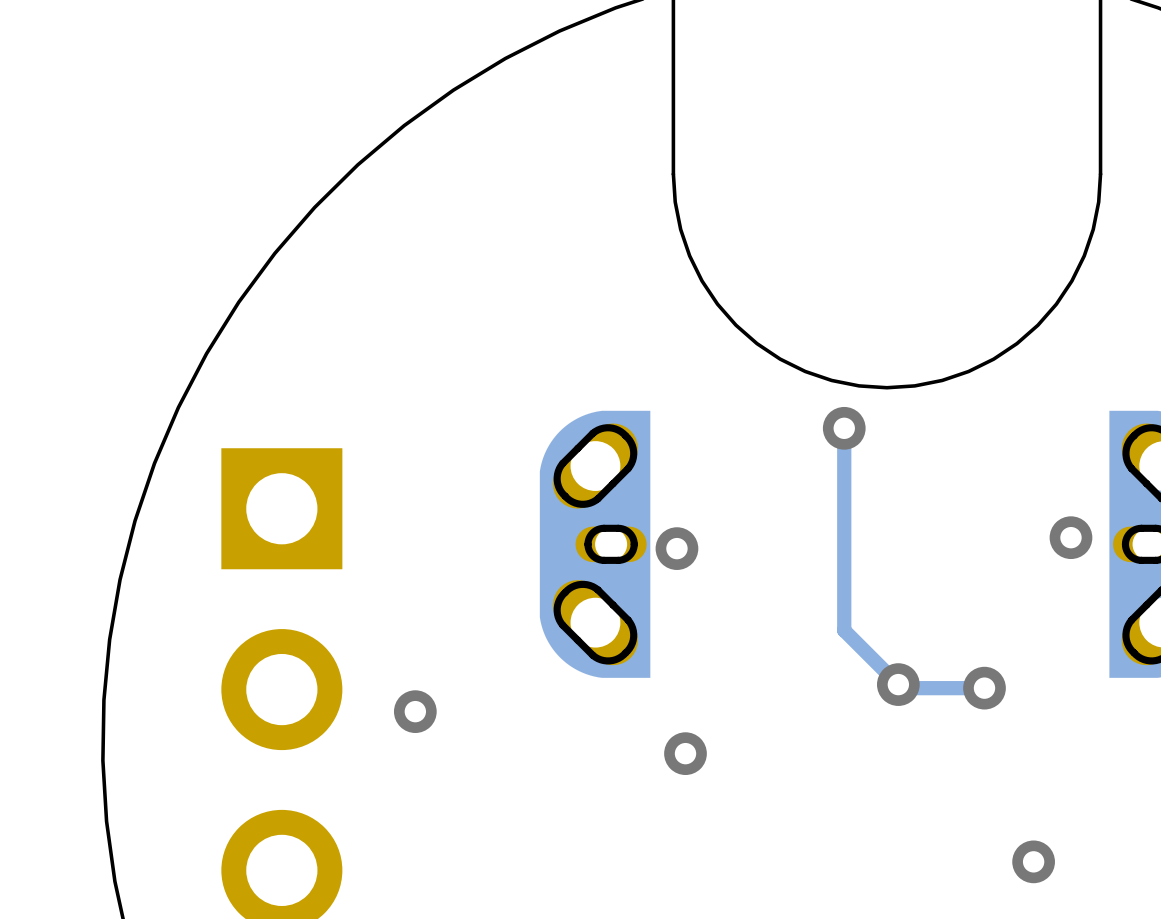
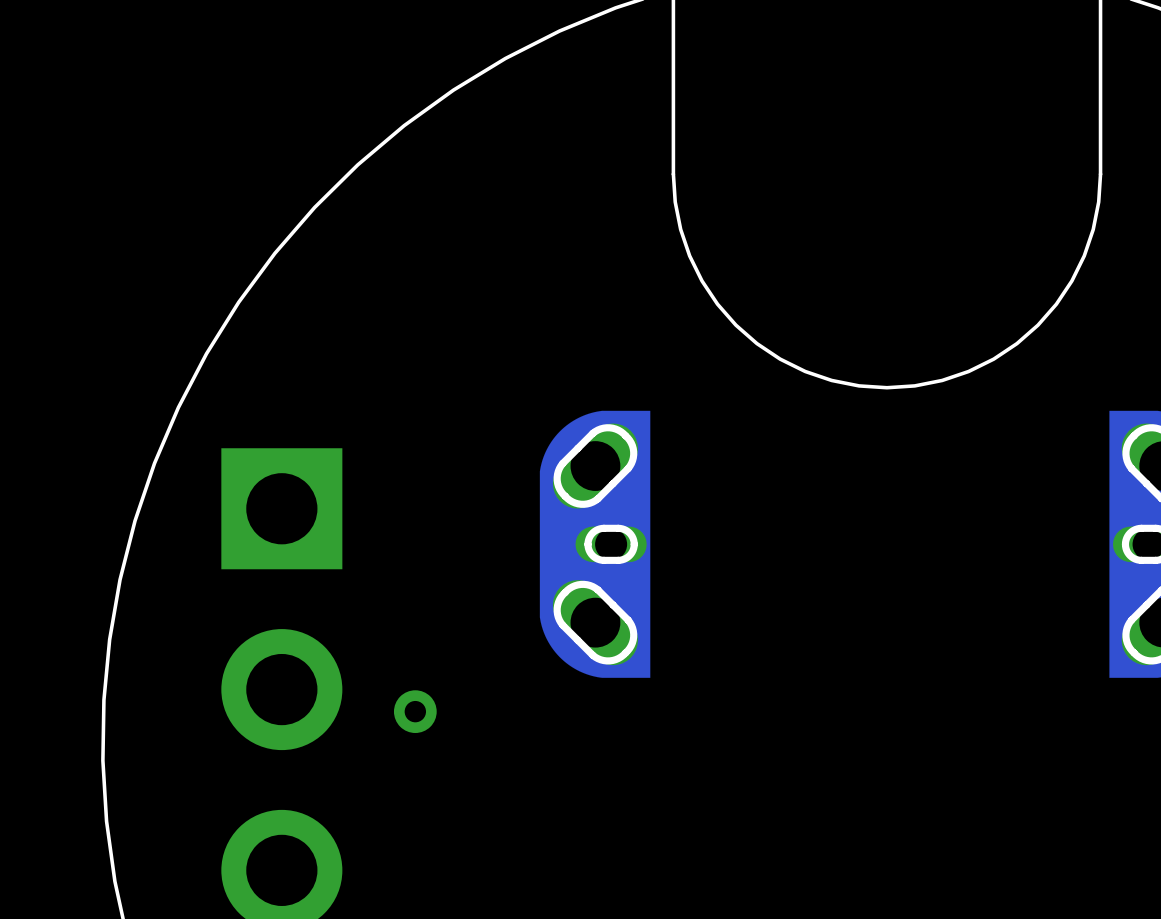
track: (844, 428) (844, 630) (901, 688) (984, 688) -> none
via: (844, 428) -> none
via: (1070, 537) -> none
via: (676, 548) -> none
via: (898, 684) -> none
via: (984, 688) -> none
via: (685, 753) -> none
via: (1033, 861) -> none

